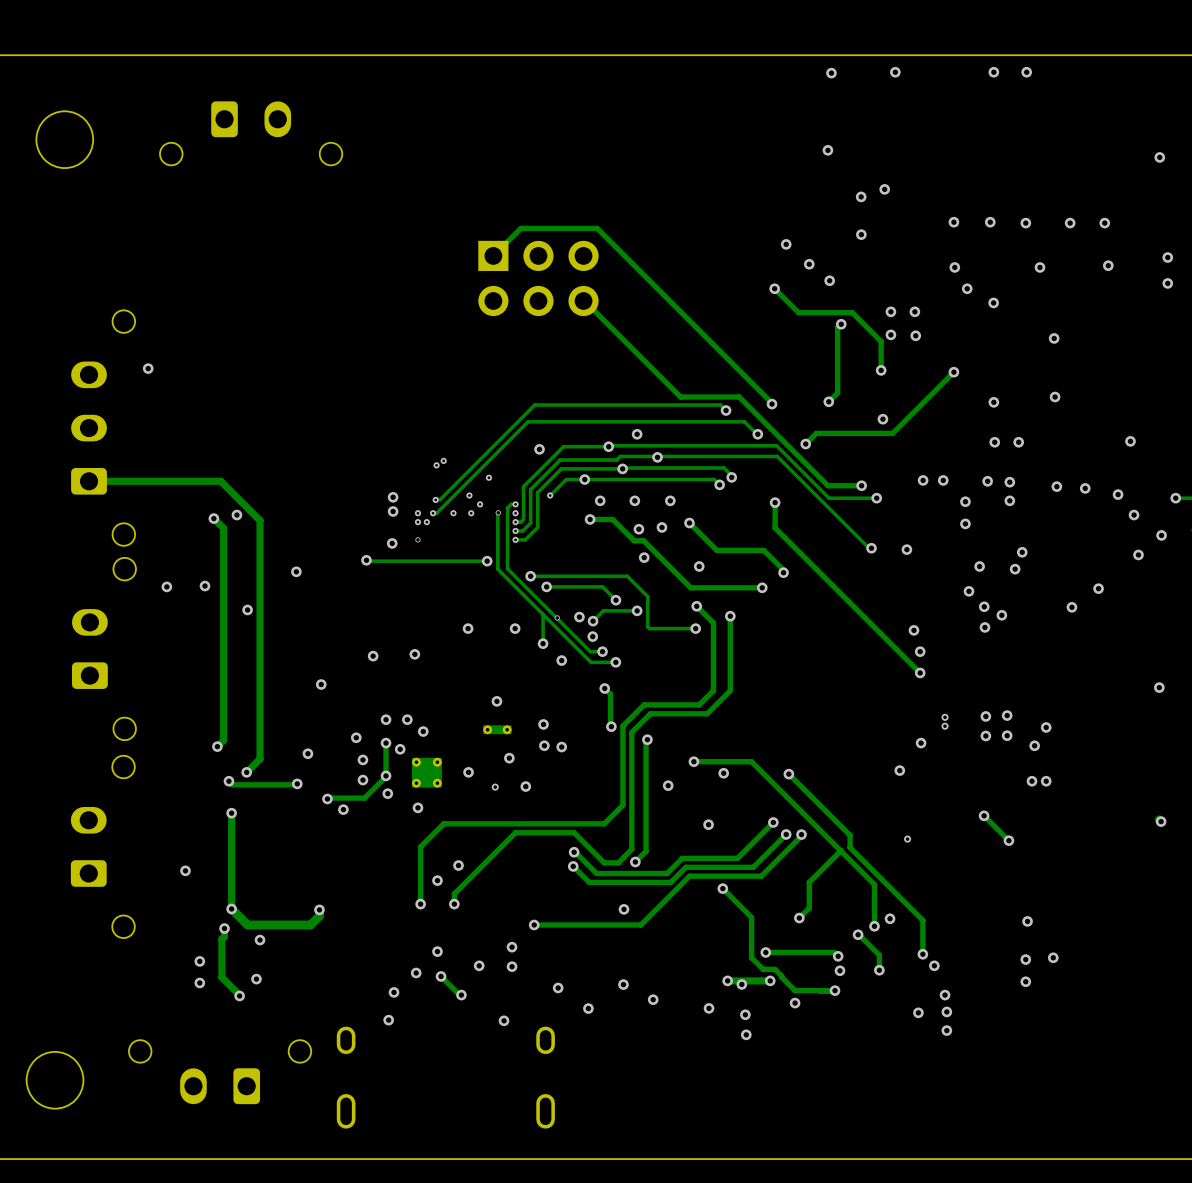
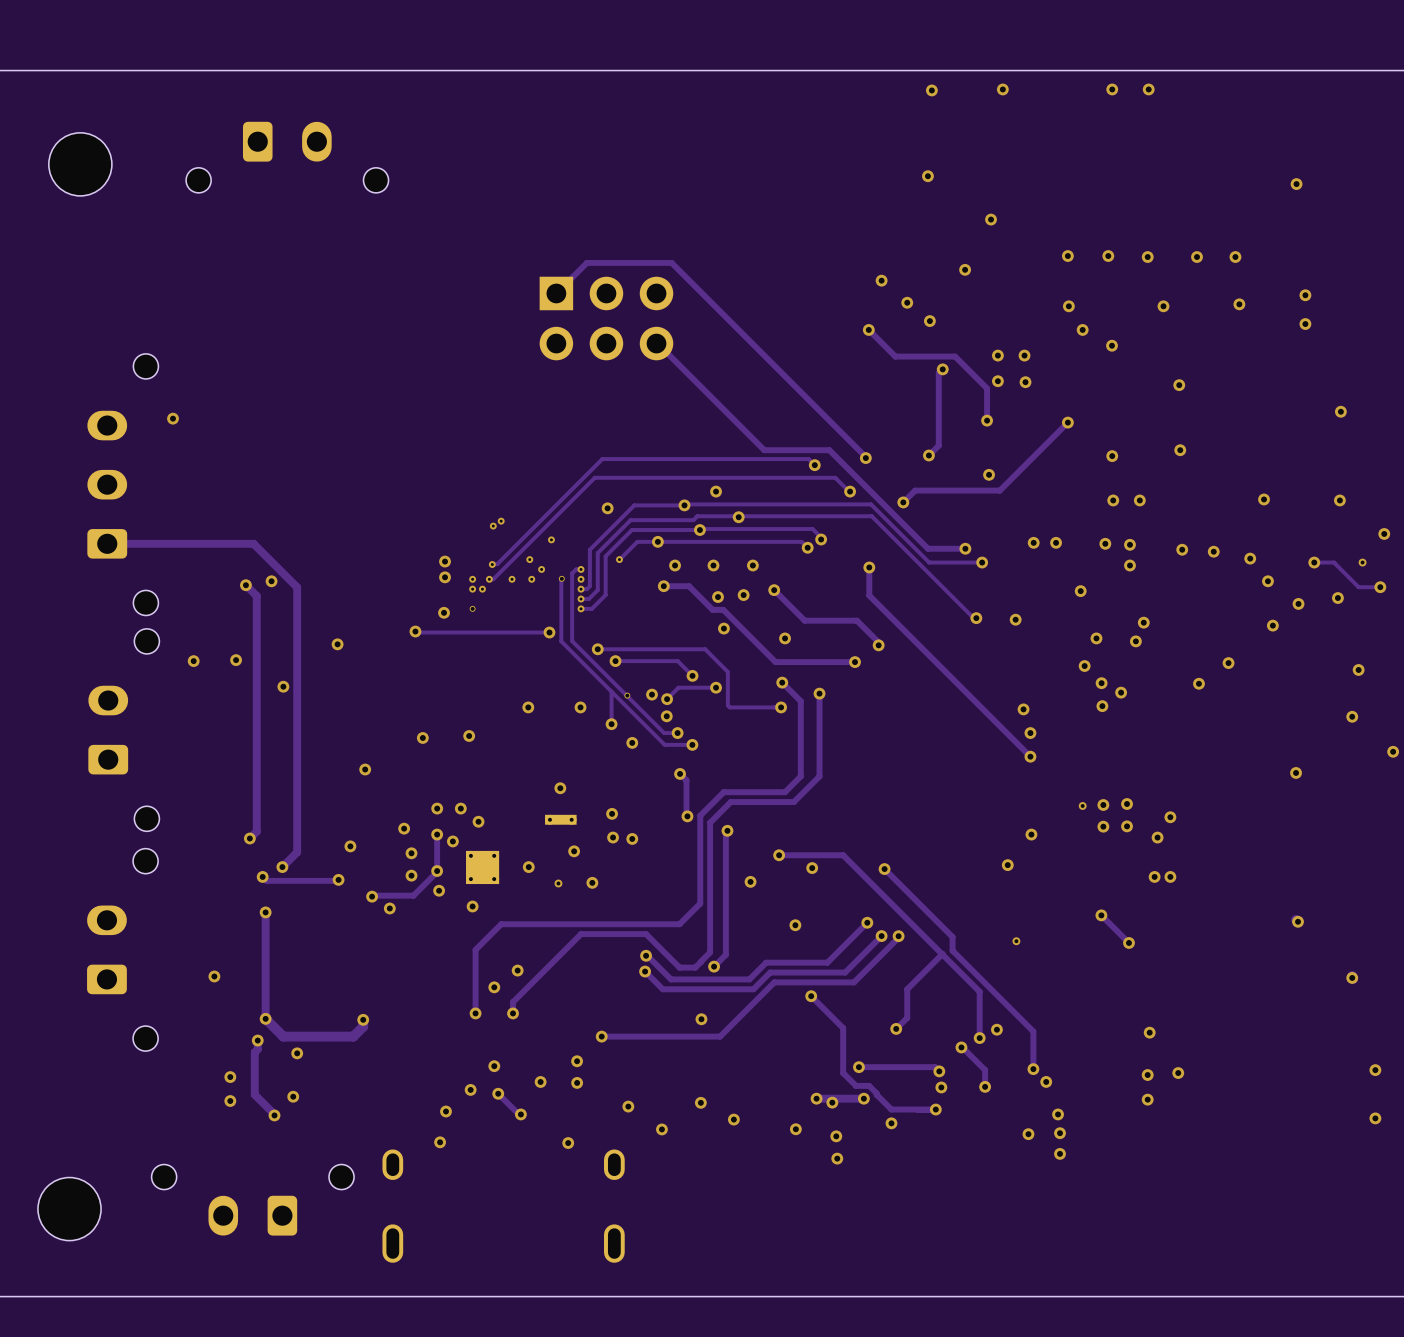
via: (861, 196) -> none
via: (965, 501) -> none
via: (945, 717) -> none
via: none -> (1082, 805)
via: (945, 726) -> none

